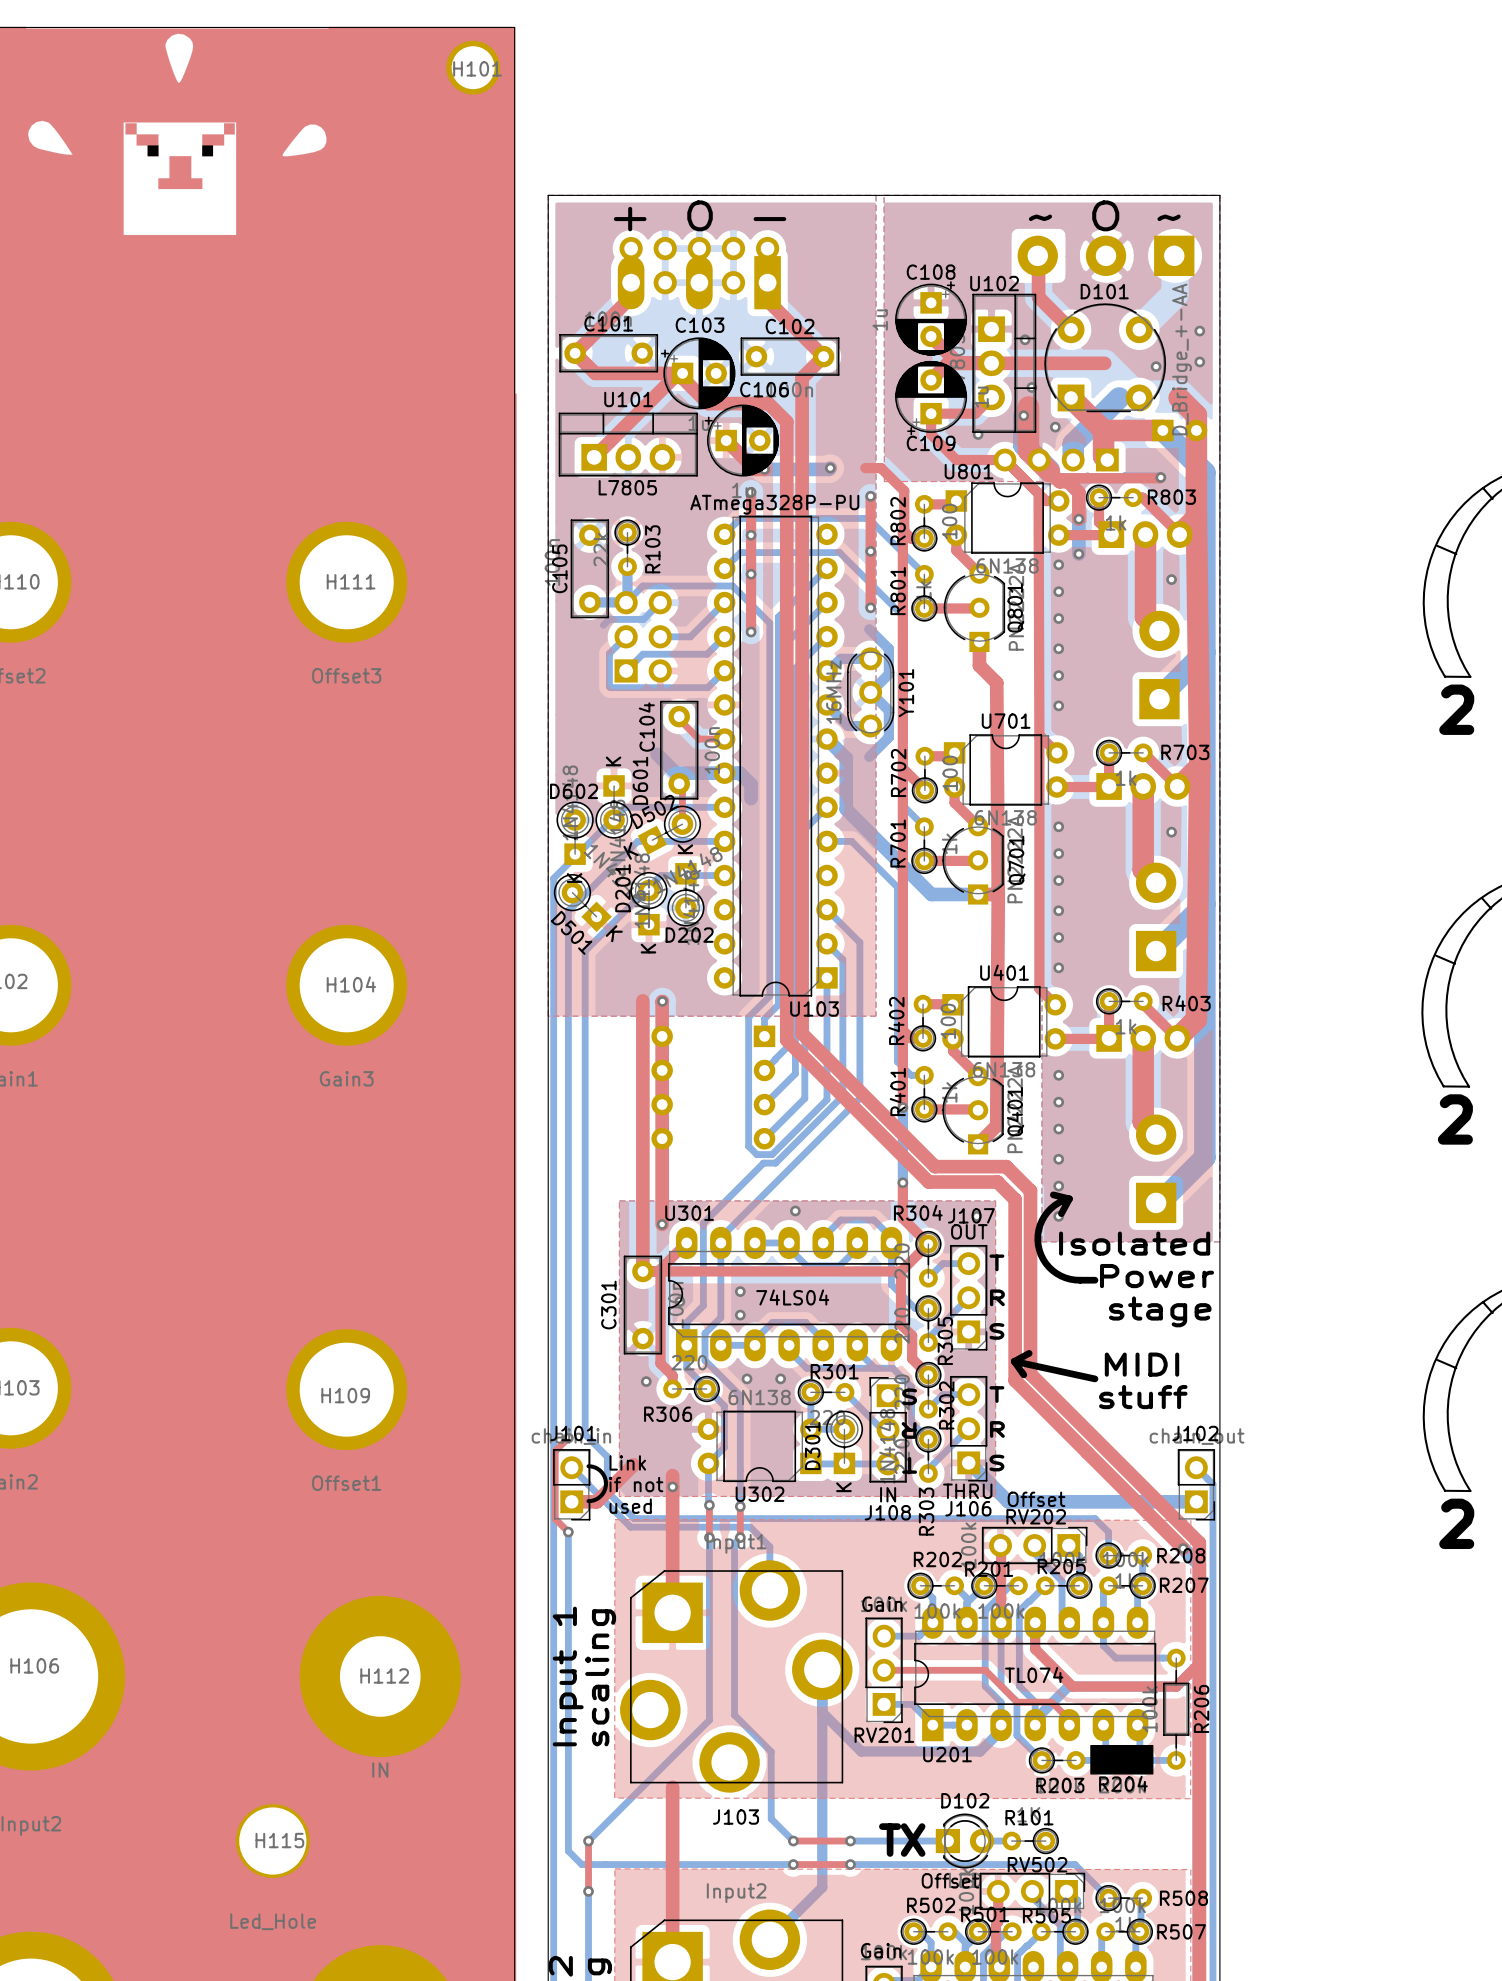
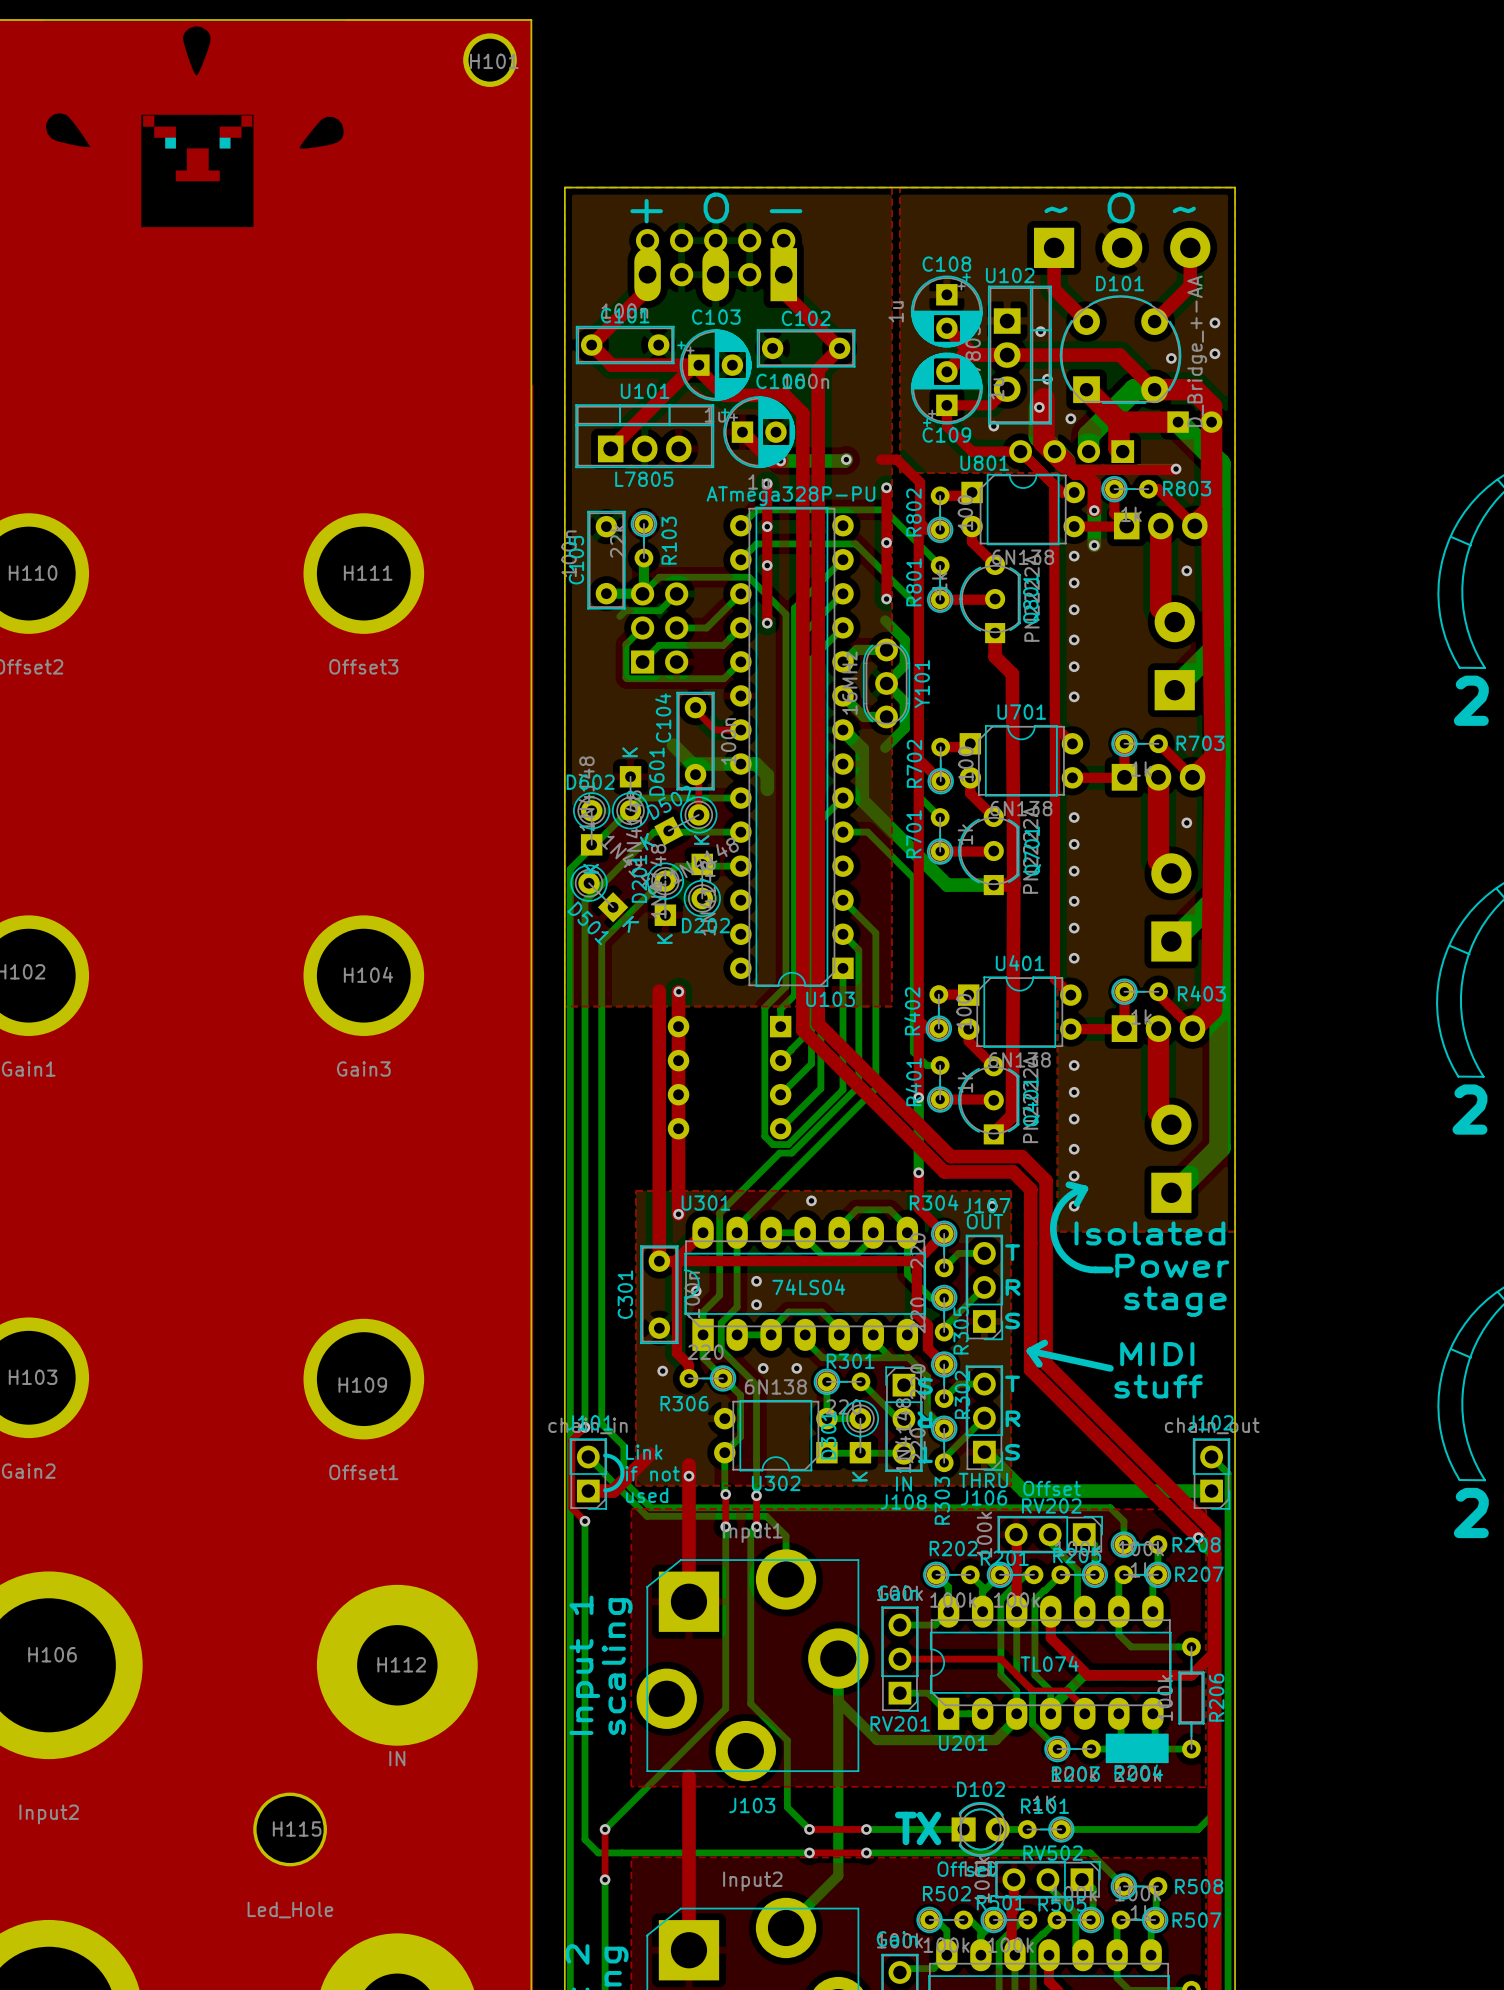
part rotation: 0° (1106, 255) -> 180° (1122, 247)
top track: none -> (1190, 247) (1190, 285) (1154, 321)
top track: none -> (1120, 355) (1154, 389) (1194, 389)
bottom track: none -> (1214, 1813) (1198, 1829) (1061, 1829)

